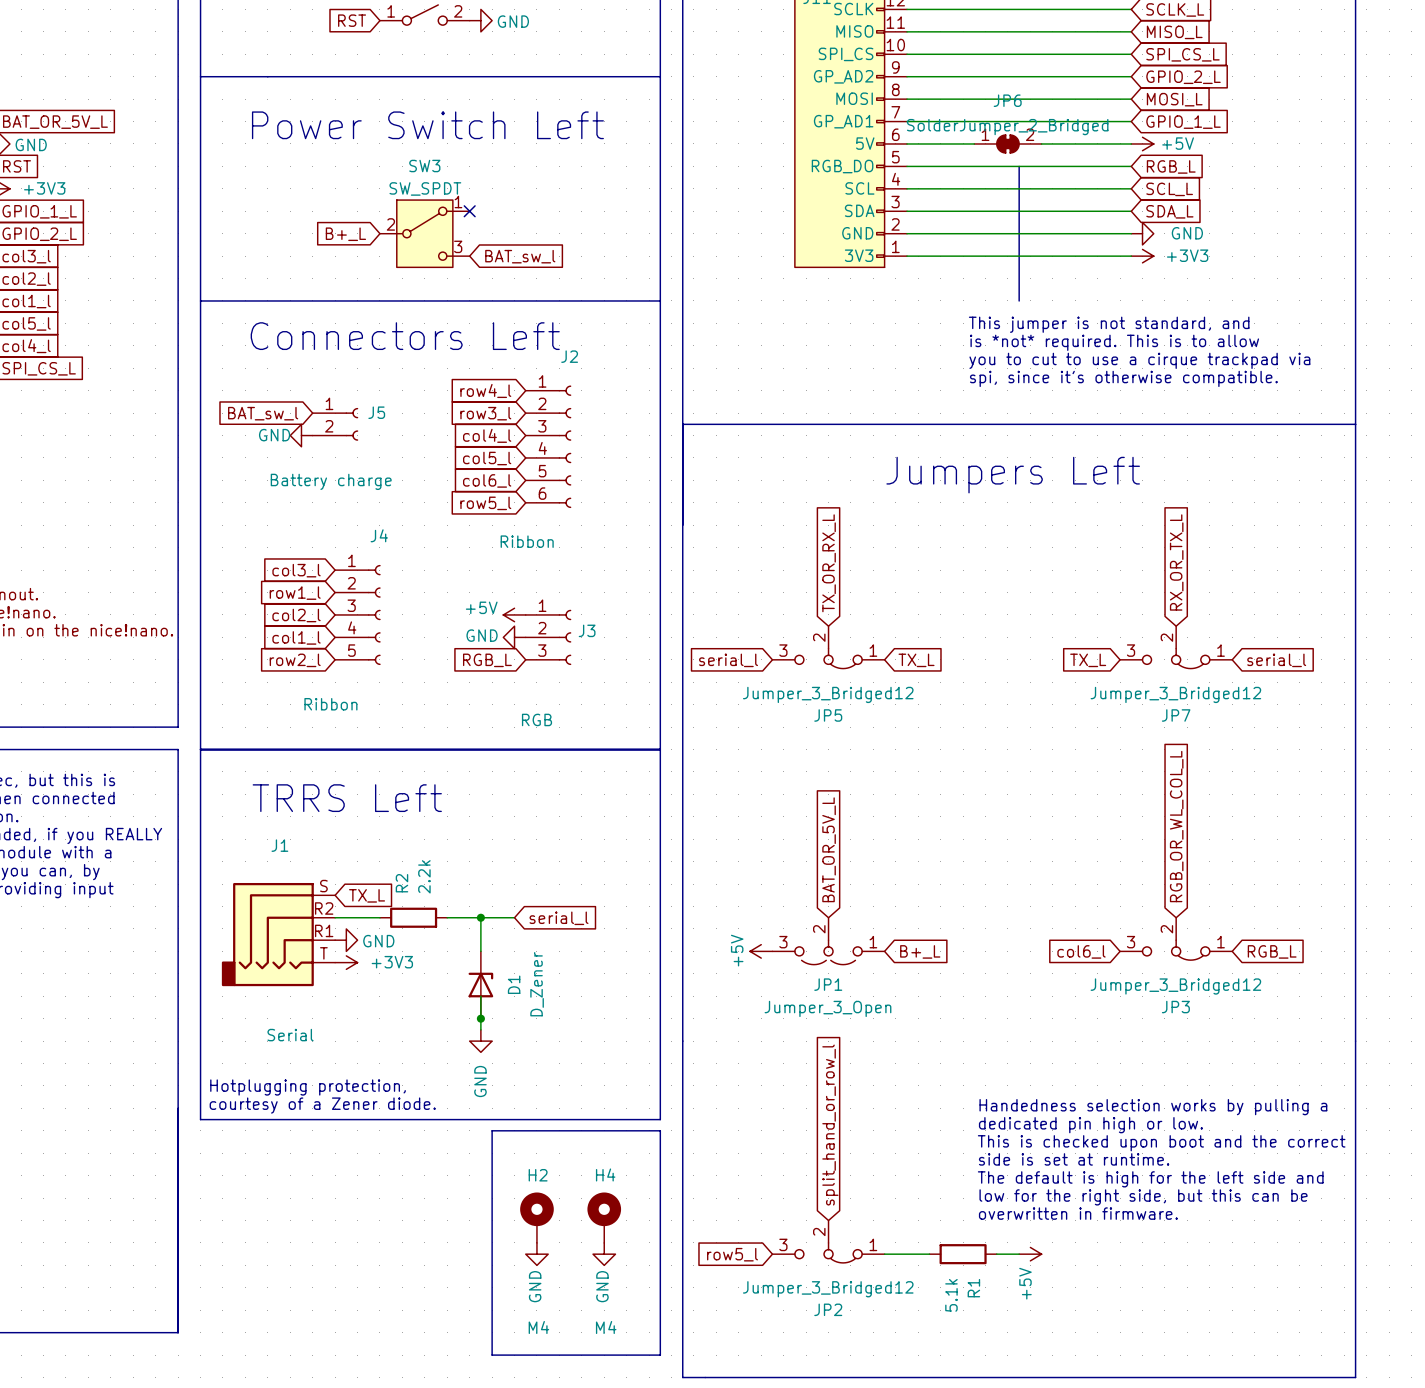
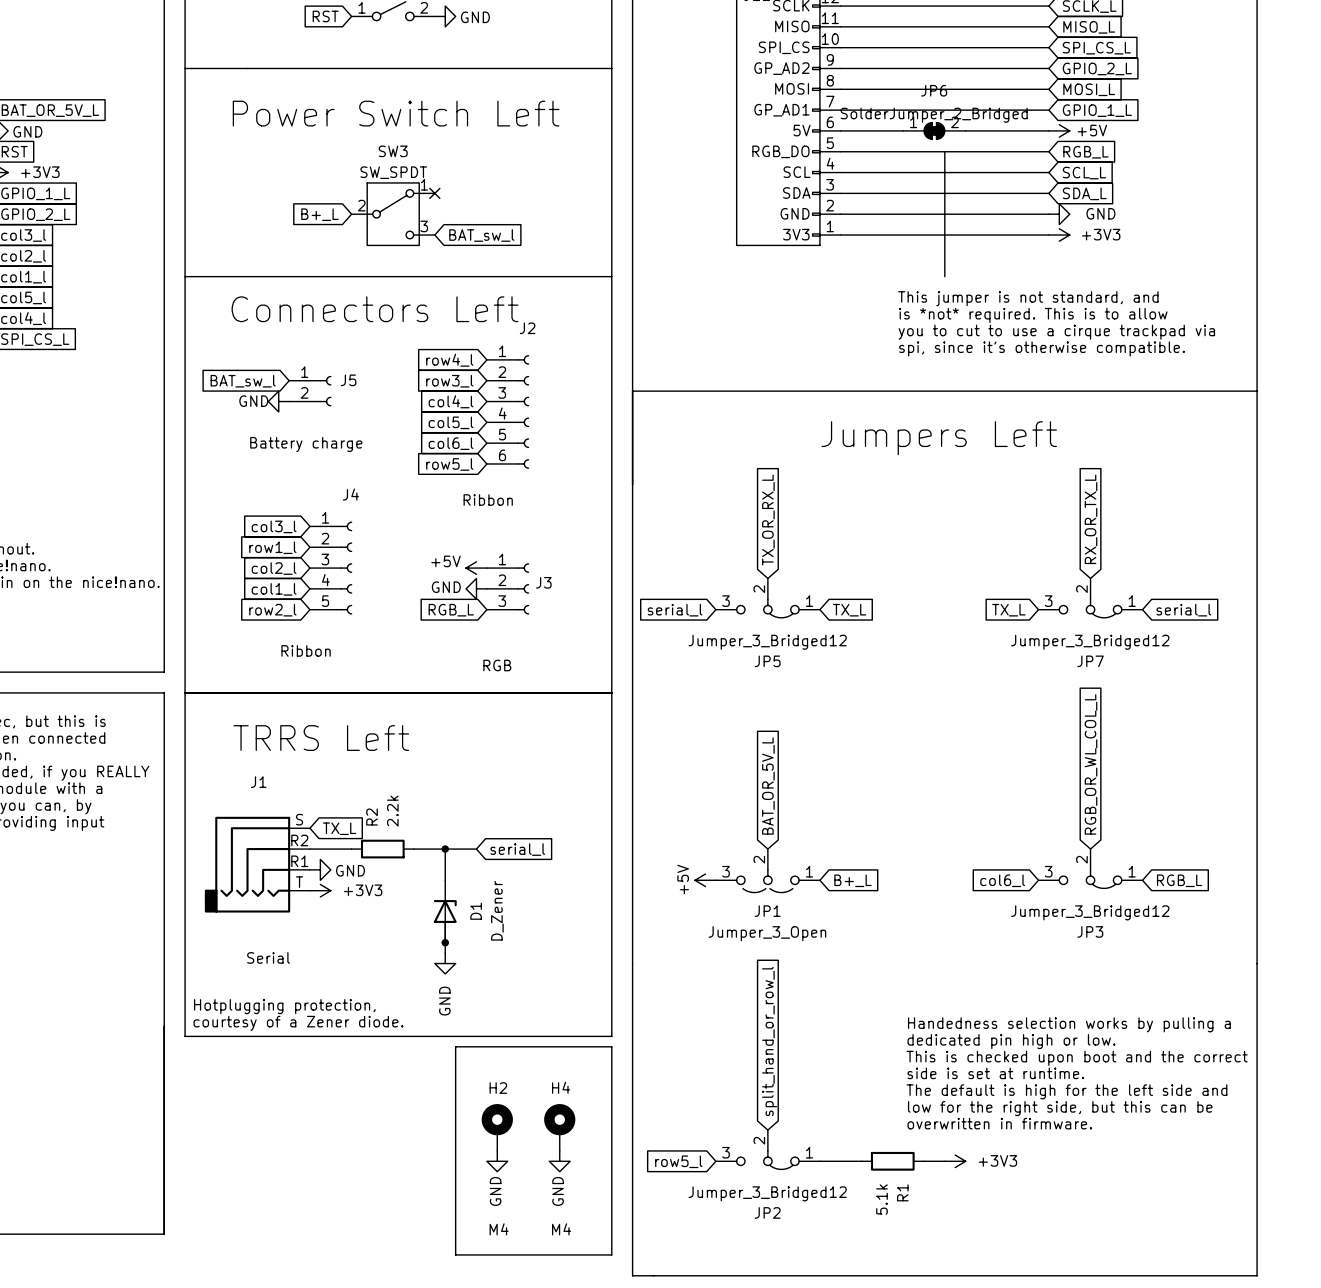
power symbol: +5V (1030, 1254) -> +3V3 (955, 1161)

